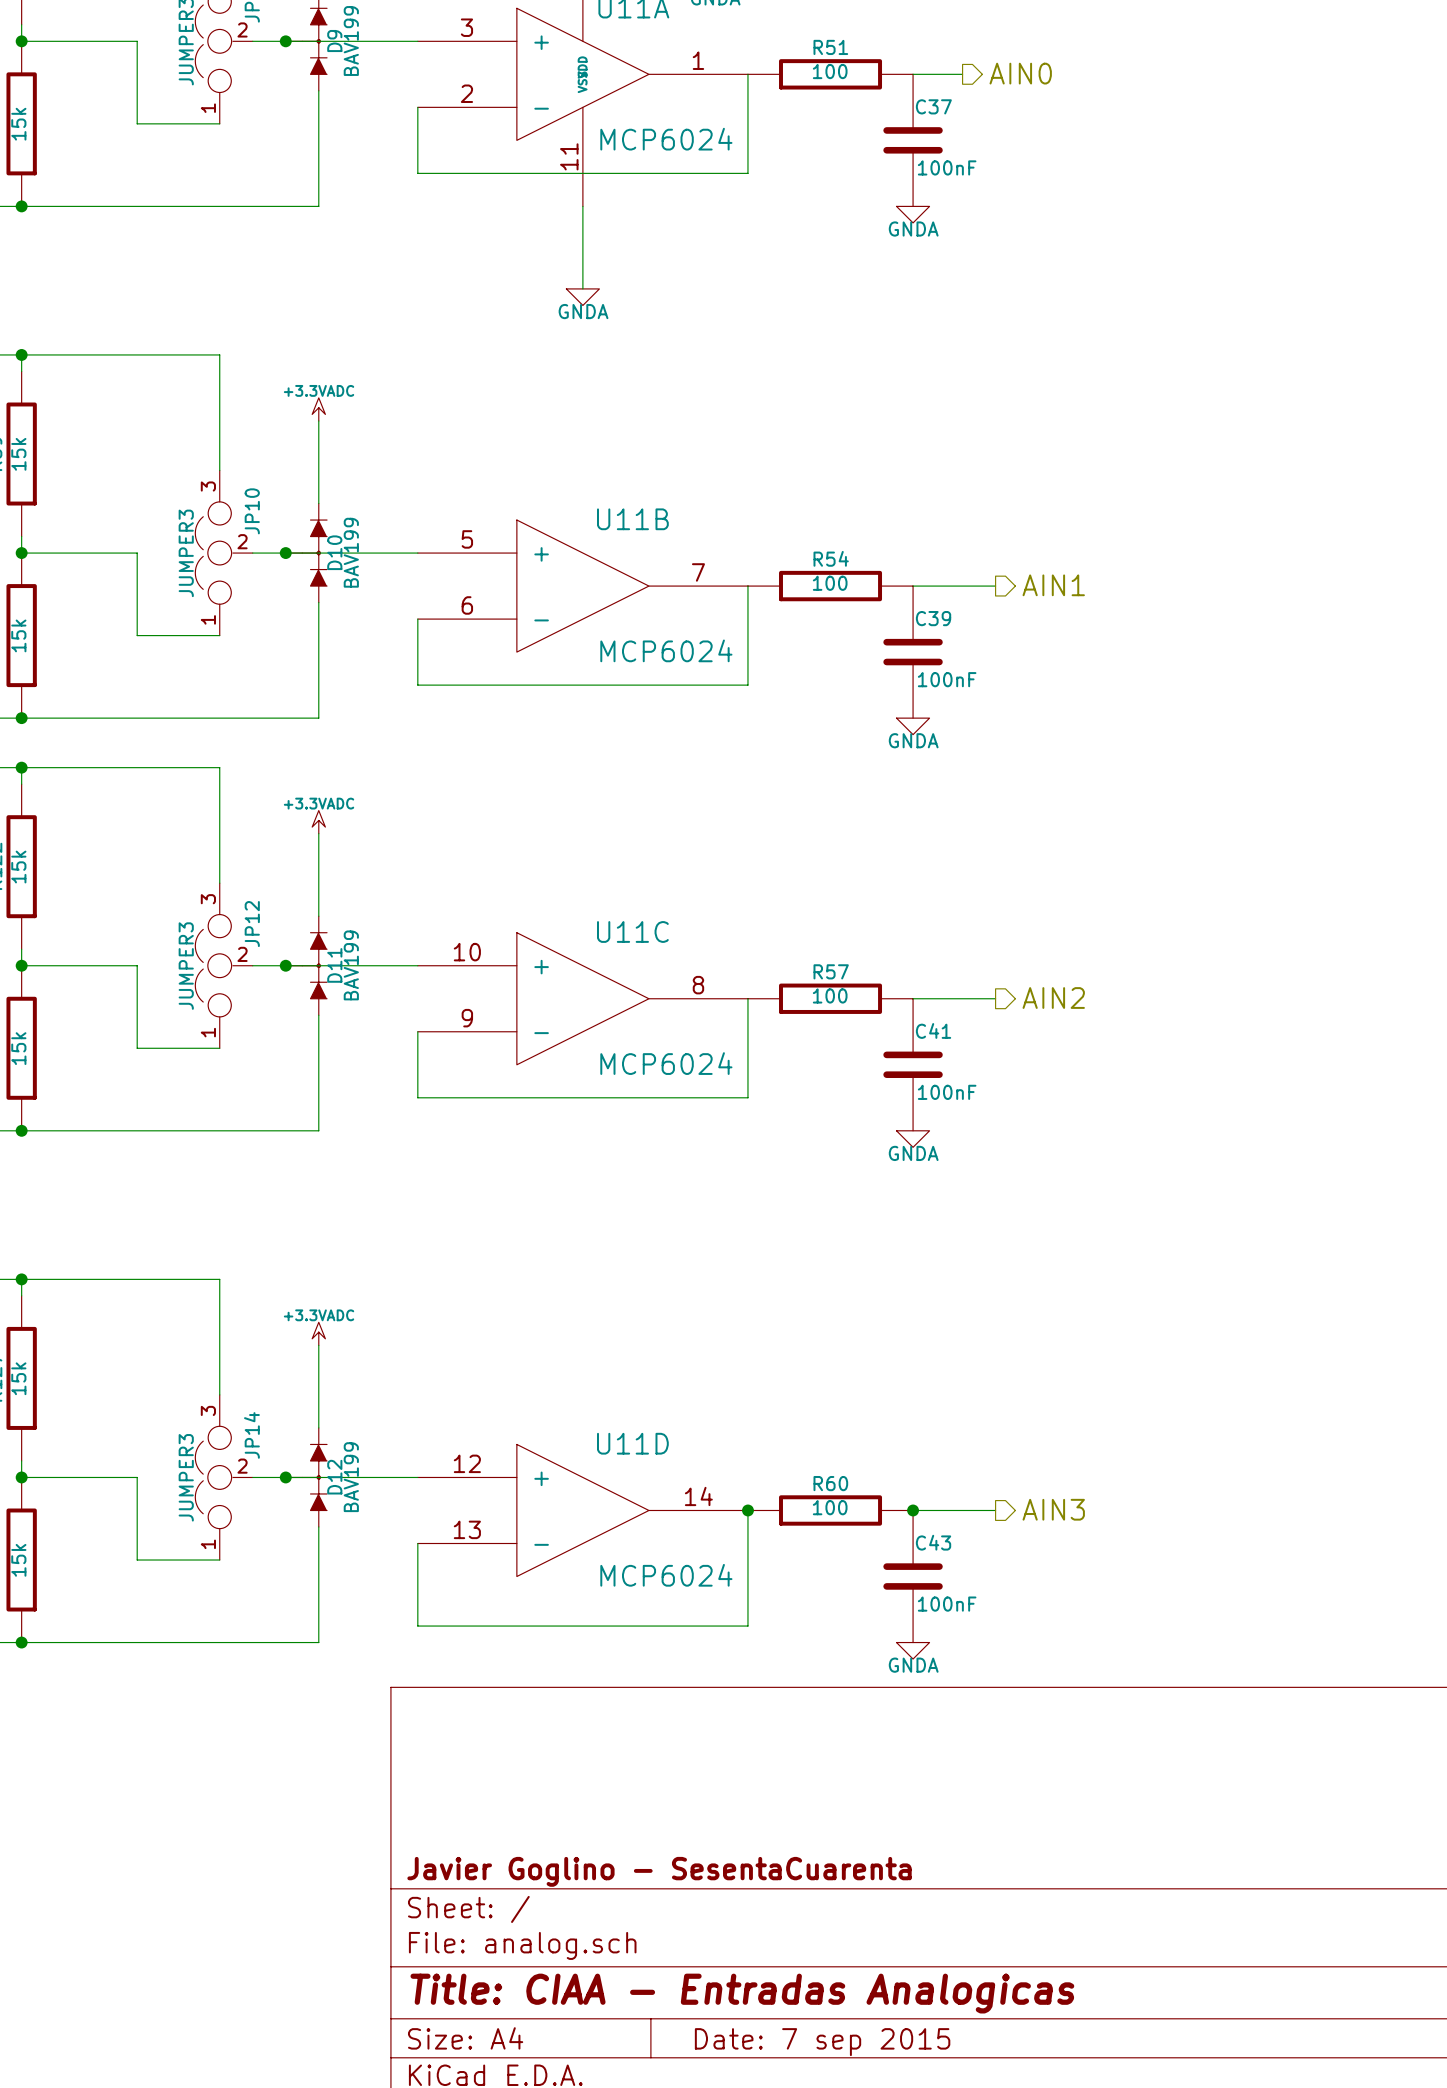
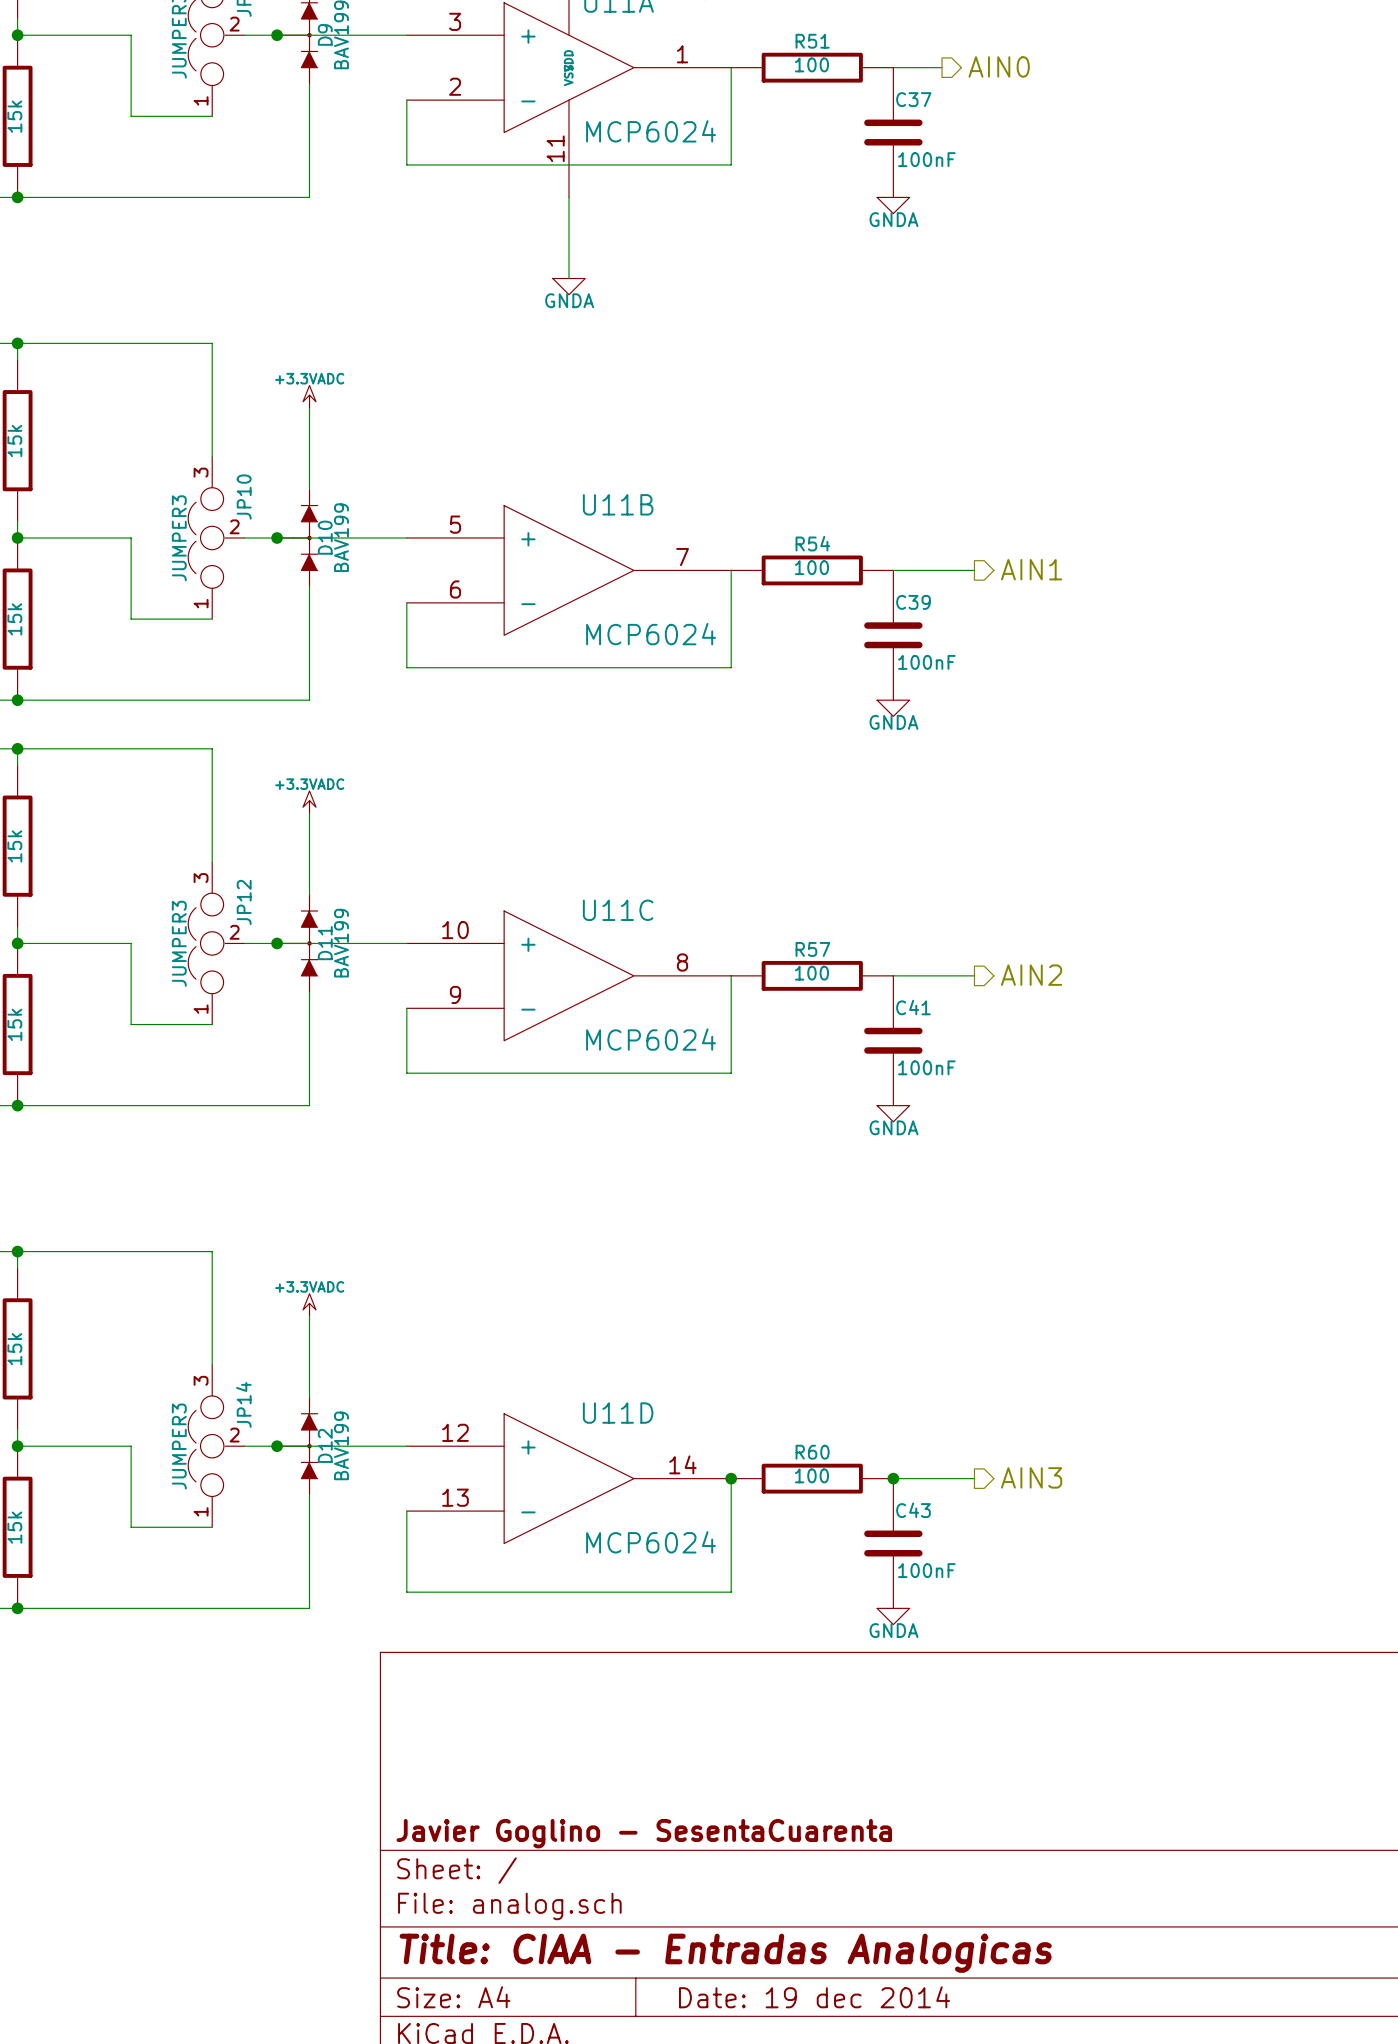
title block: Date: 7 sep 2015 (822, 2042) -> Date: 19 dec 2014 (814, 1997)

